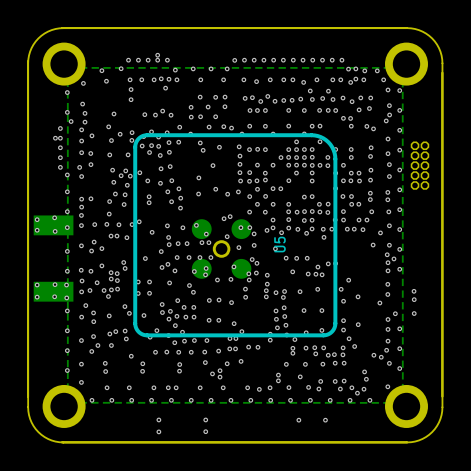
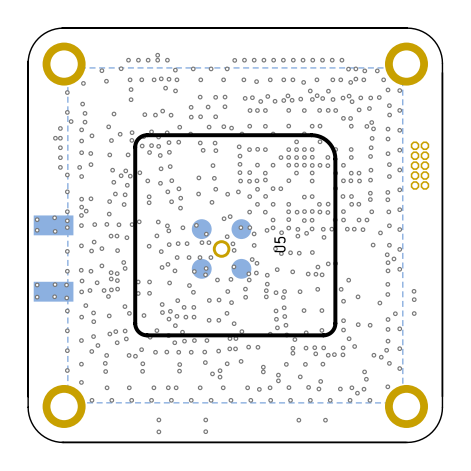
via: none -> (175, 90)
via: none -> (287, 95)
via: none -> (317, 95)
via: none -> (349, 96)
via: none -> (379, 97)
via: (386, 120) -> none
via: none -> (371, 122)
via: none -> (388, 129)
via: none -> (372, 138)
via: none -> (215, 143)
via: (219, 147) -> none
via: none -> (215, 150)
via: none -> (214, 178)
via: none -> (211, 202)
via: none -> (86, 211)
via: none -> (67, 220)
via: none -> (158, 222)
via: none -> (168, 230)
via: (152, 232) -> none
via: none -> (156, 235)
via: none -> (297, 236)
via: (168, 237) -> none
via: none -> (232, 243)
via: none -> (149, 246)
via: (238, 247) -> none
via: none -> (117, 250)
via: none -> (234, 250)
via: none -> (290, 252)
via: none -> (312, 252)
via: none -> (281, 253)
via: none -> (299, 253)
via: (145, 258) -> none
via: (286, 258) -> none
via: (296, 258) -> none
via: (307, 258) -> none
via: none -> (277, 269)
via: none -> (227, 291)
via: none -> (226, 313)
via: none -> (370, 325)
via: (270, 340) -> none
via: none -> (117, 342)
via: (111, 345) -> none
via: none -> (141, 349)
via: none -> (106, 355)
via: none -> (129, 355)
via: (131, 356) -> none
via: none -> (135, 356)
via: (335, 363) -> none
via: (344, 363) -> none
via: none -> (263, 367)
via: none -> (263, 371)
via: (335, 381) -> none
via: (344, 381) -> none

